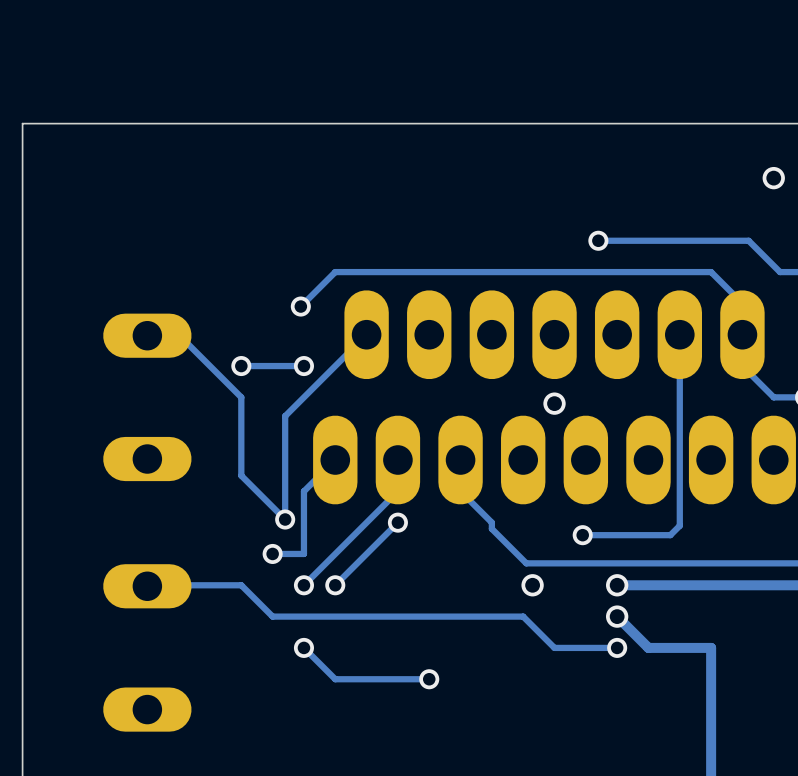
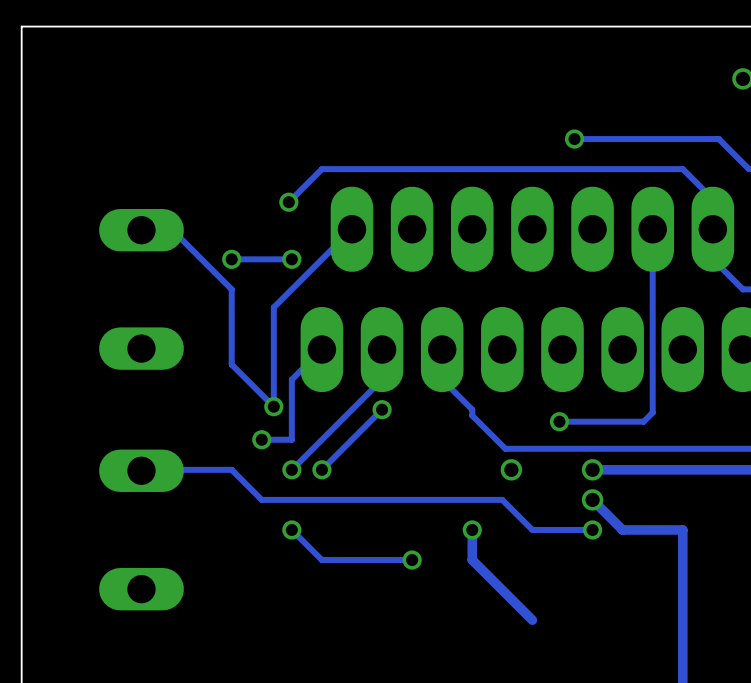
via: (554, 403) -> none
track: none -> (472, 529) (472, 560) (532, 620)
via: none -> (472, 529)

